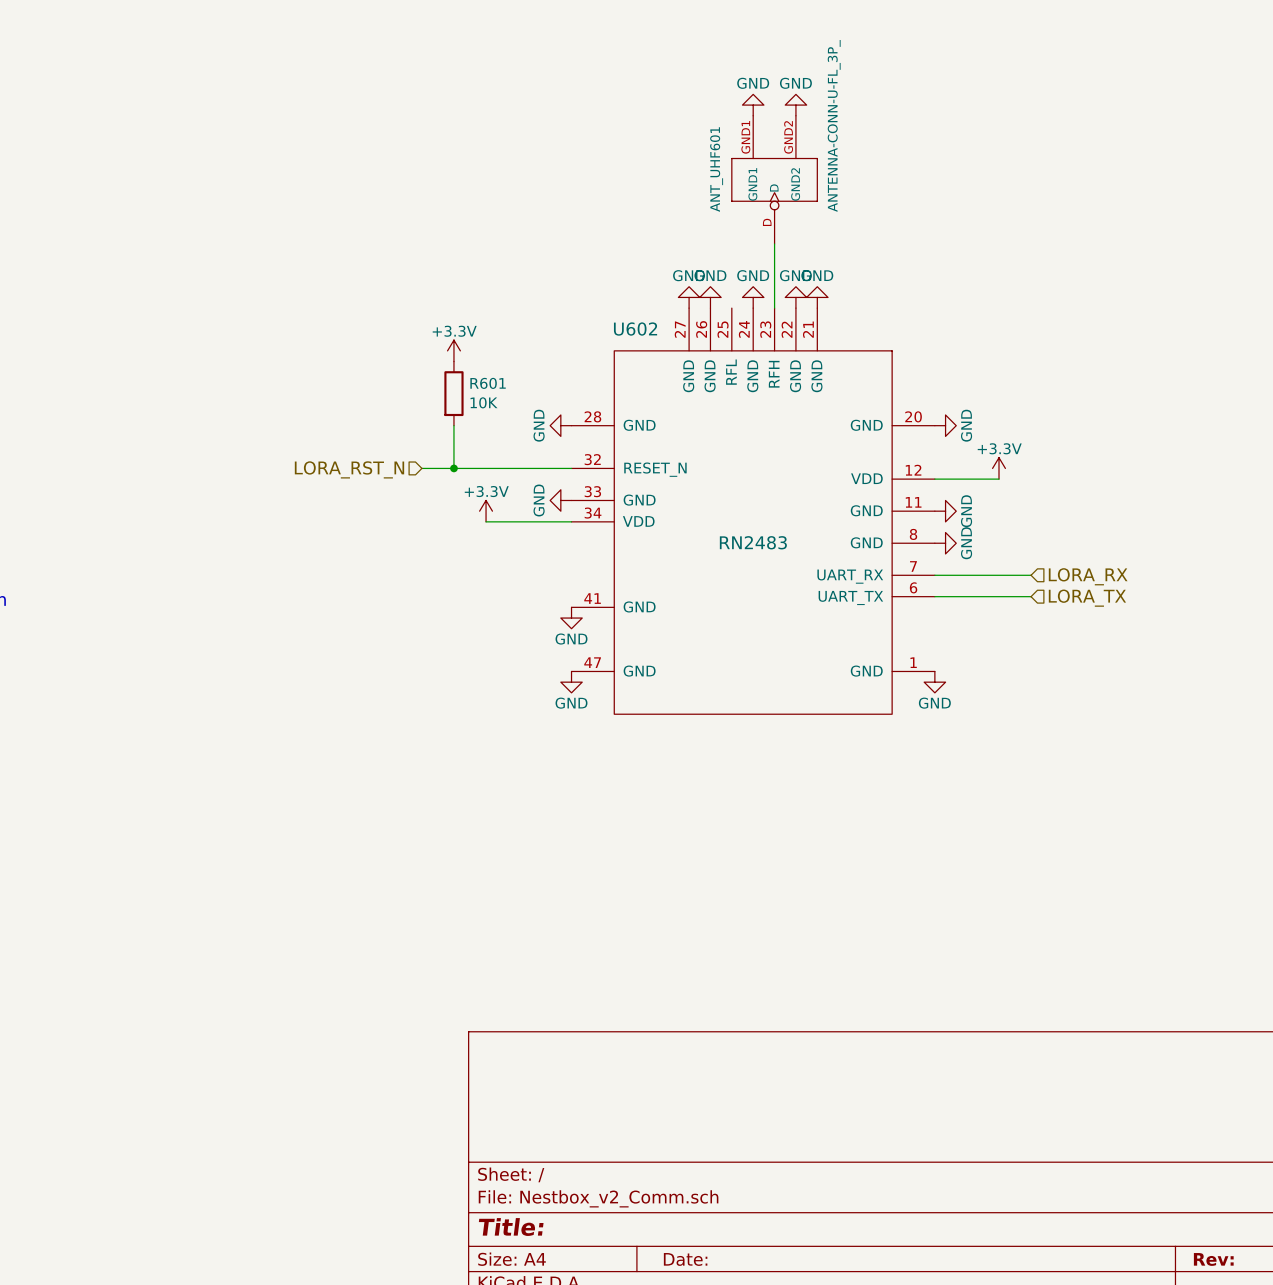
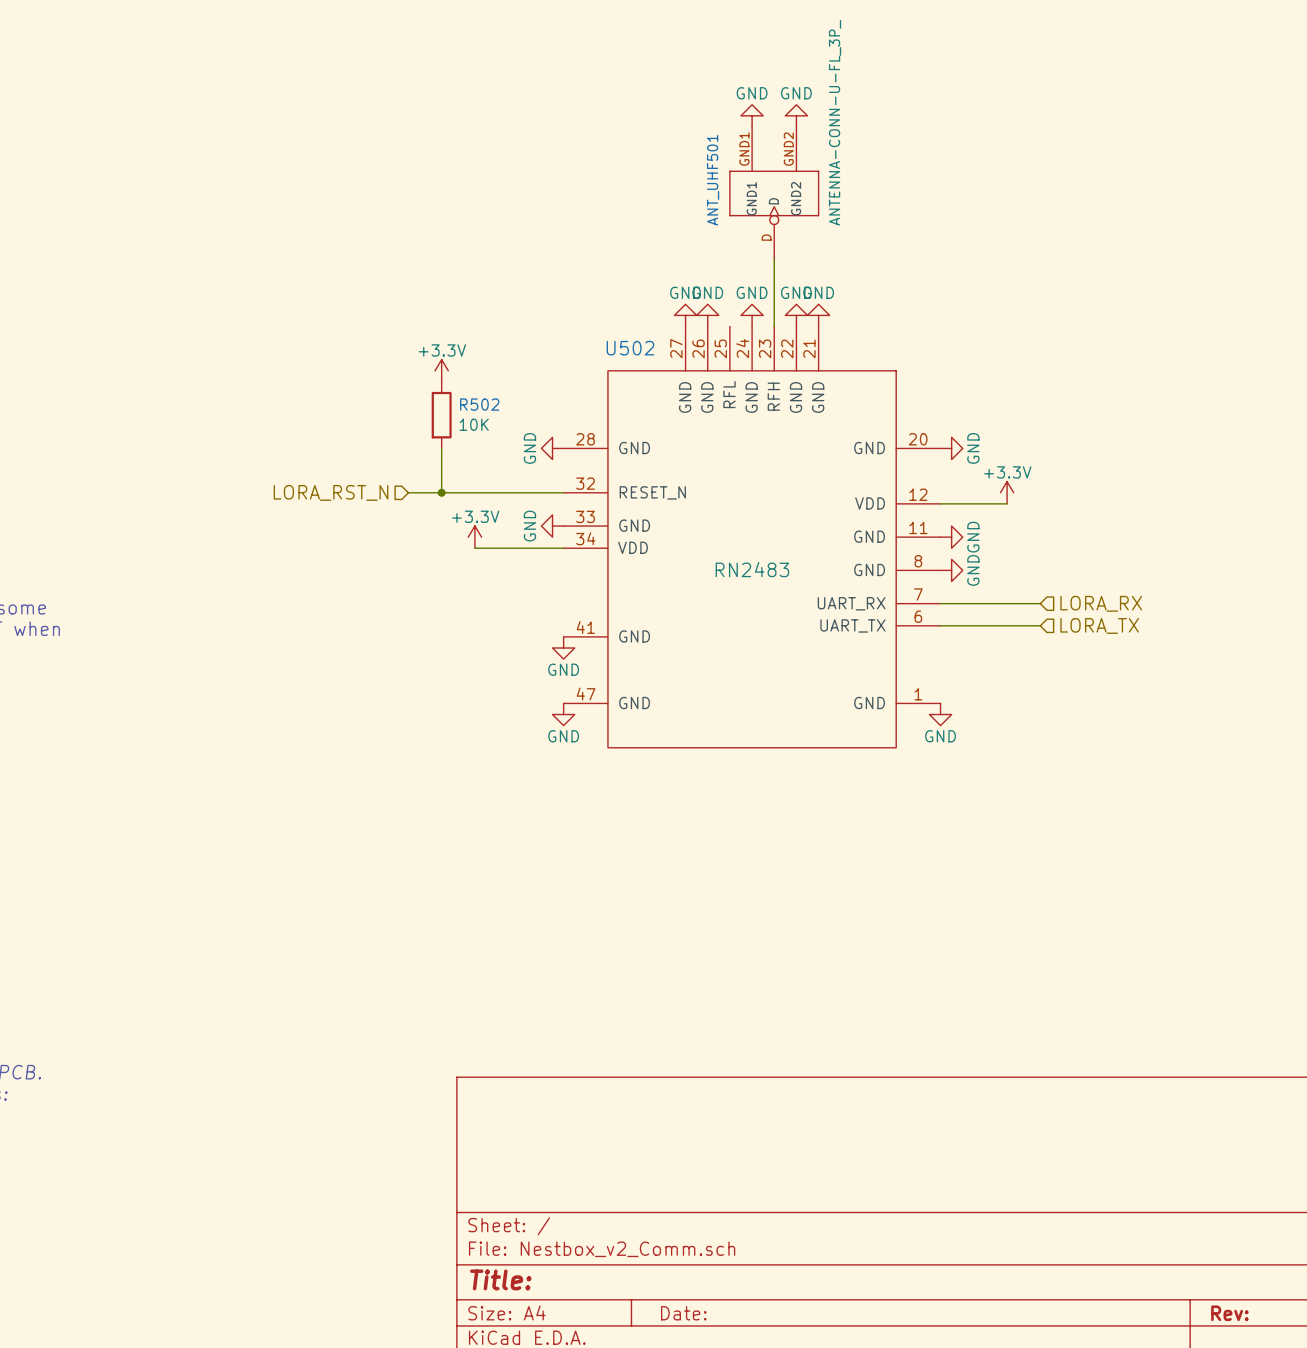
ANT_UHF601 name: ANT_UHF601 (716, 169) -> ANT_UHF501 (713, 180)
U602 name: U602 (635, 329) -> U502 (630, 348)
R601 name: R601 (488, 383) -> R502 (479, 404)

